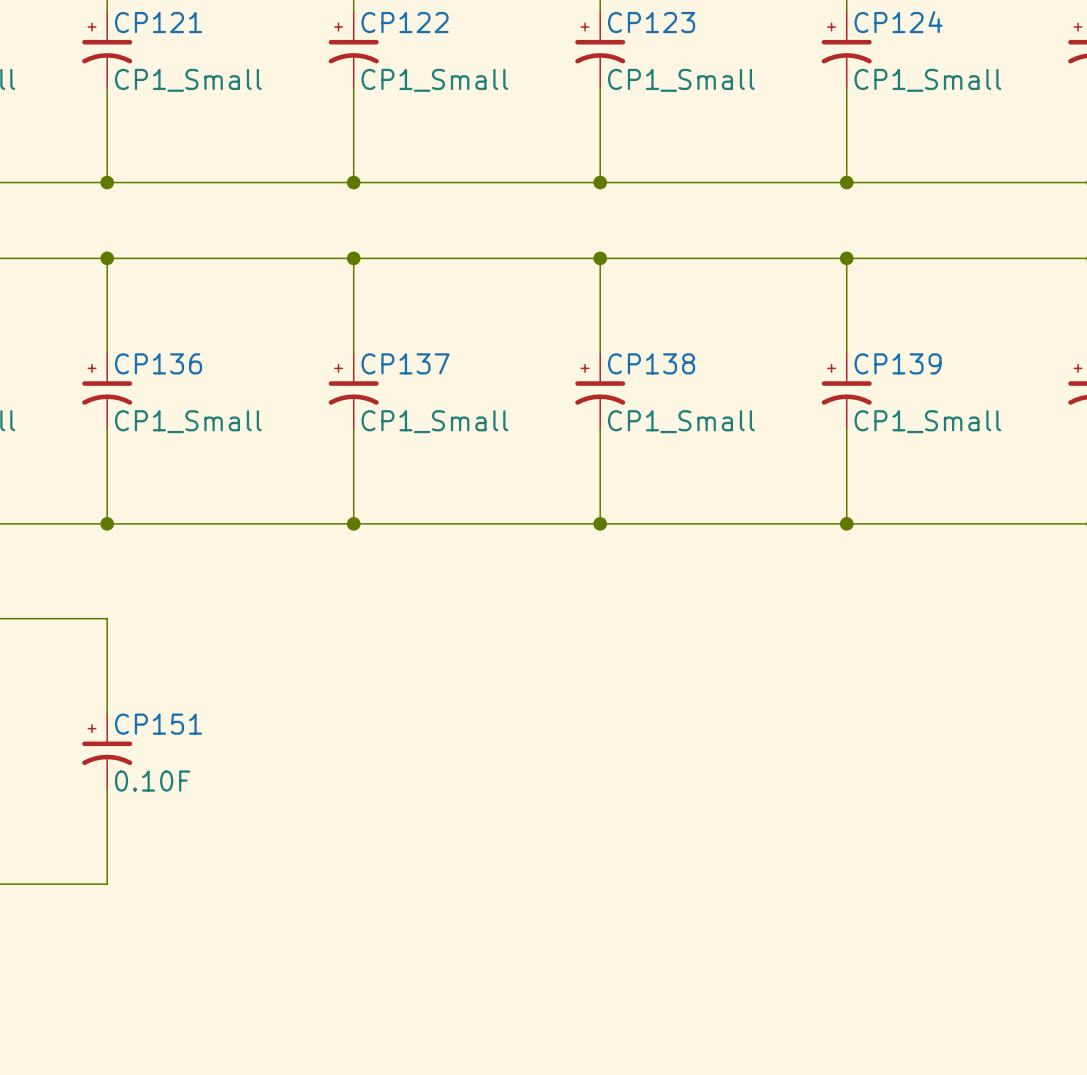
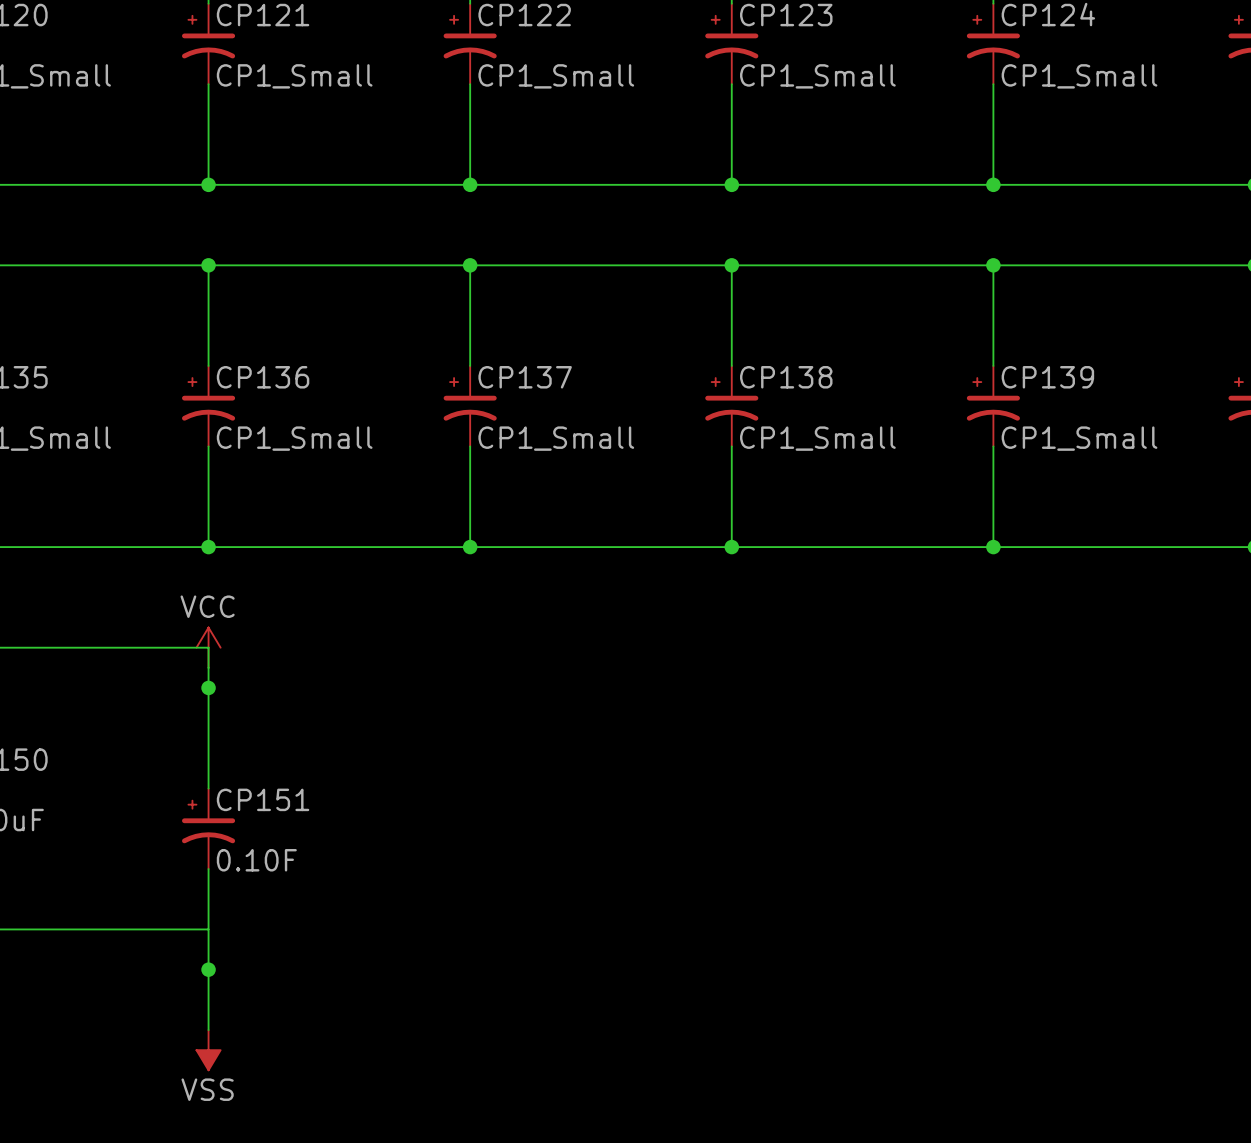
power symbol: none -> VCC (208, 647)
junction: none -> (208, 687)
CP151 position: (107, 751) -> (208, 828)
wire: none -> (208, 929) (208, 1030)
junction: none -> (208, 969)
power symbol: none -> VSS (208, 1050)

